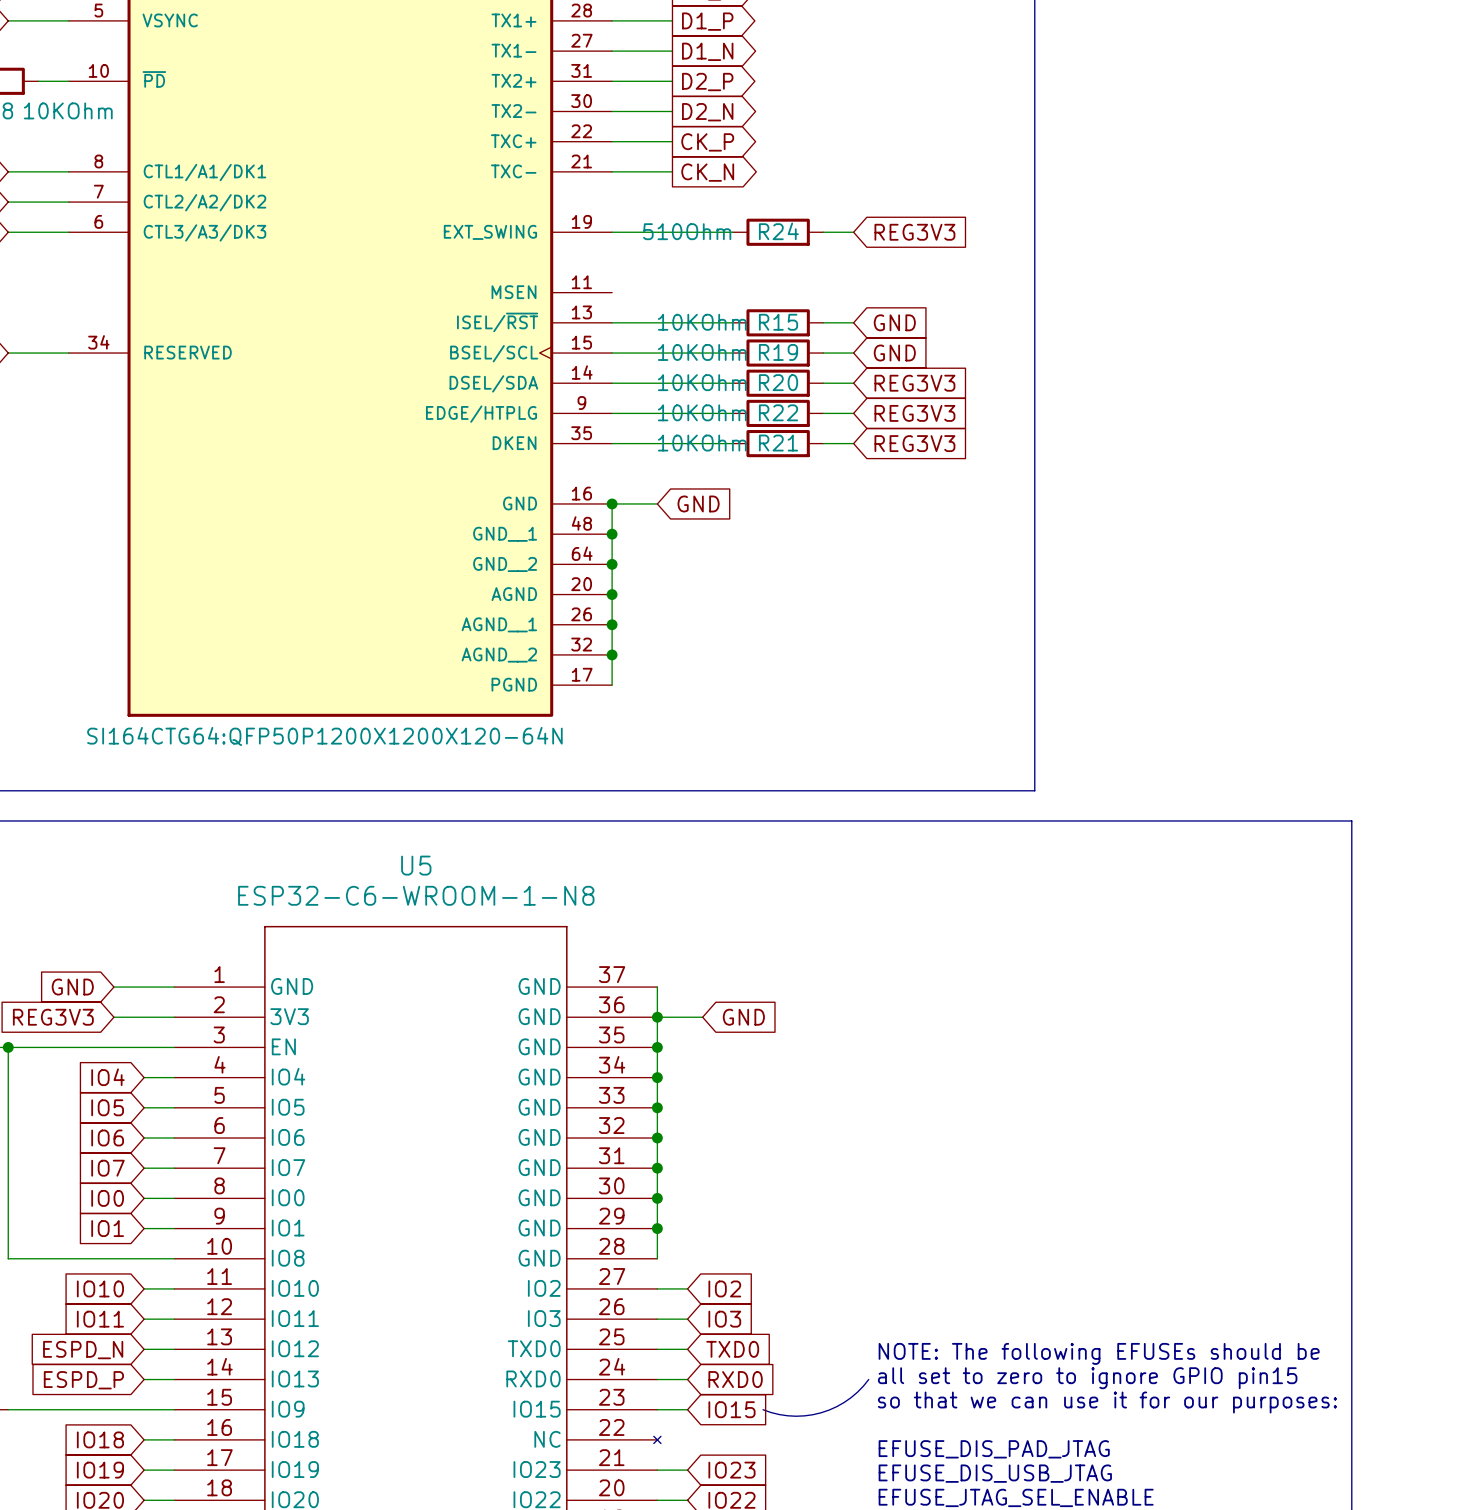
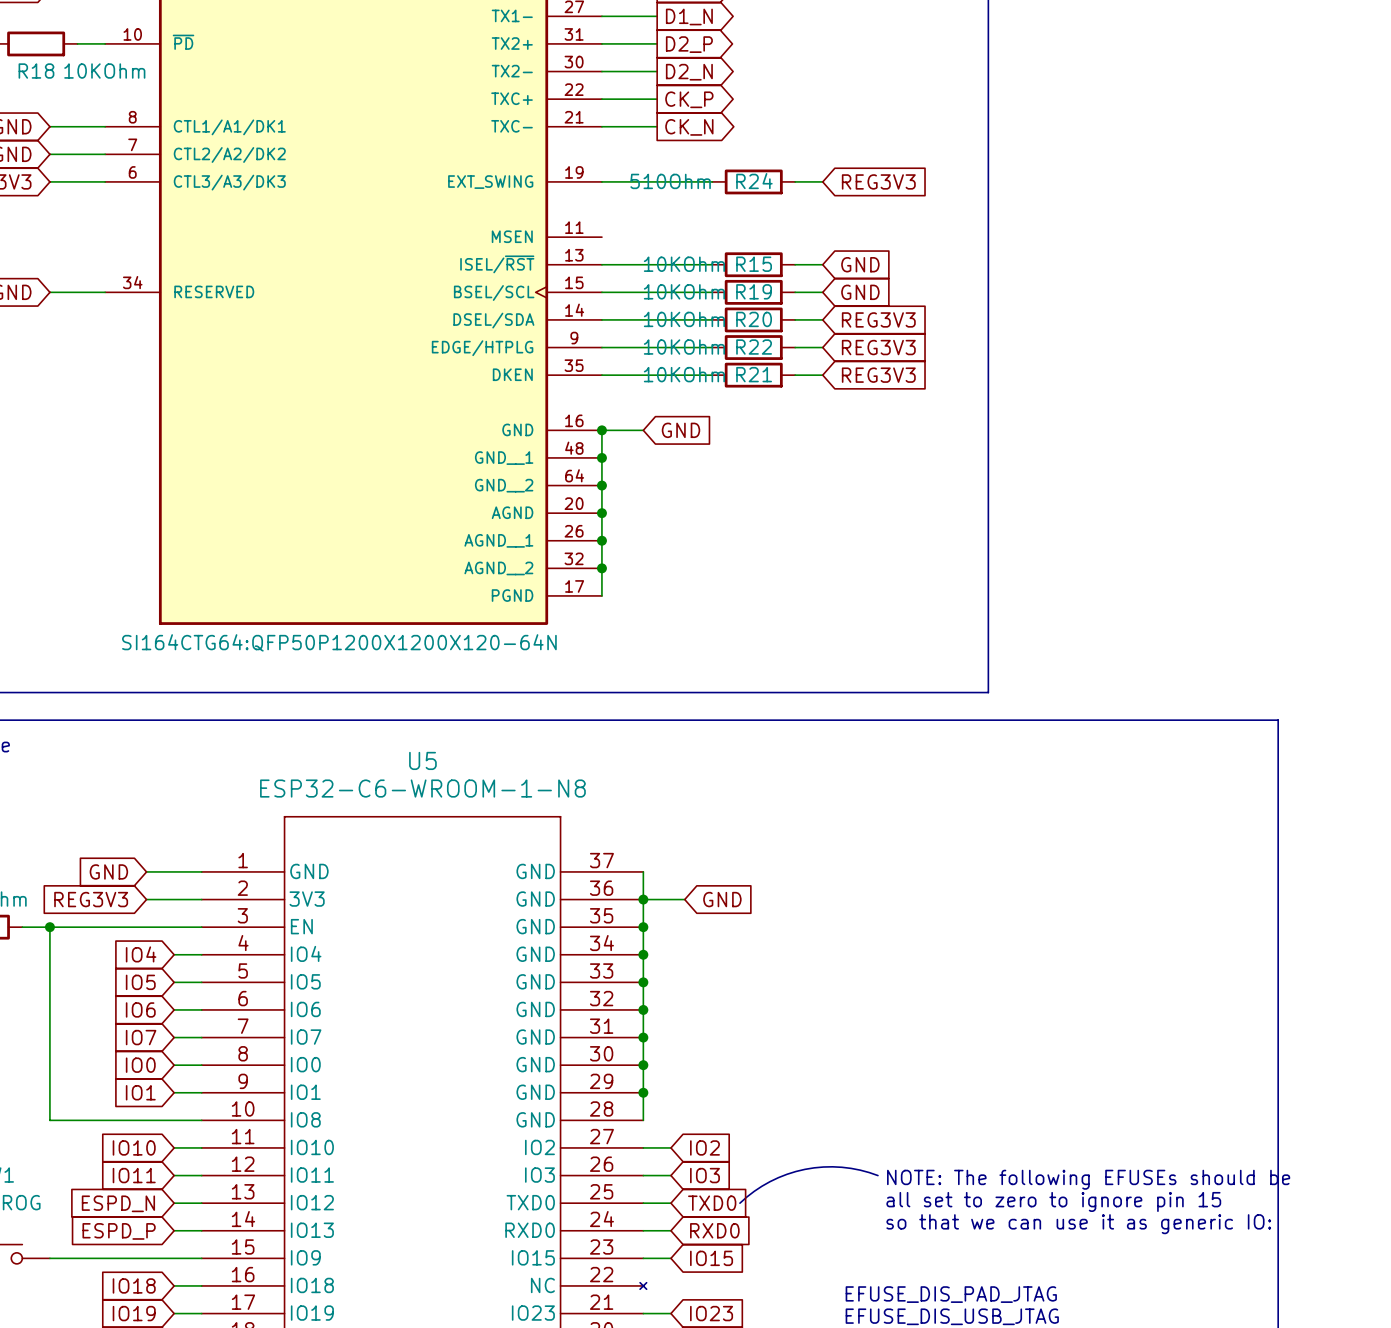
line: none -> (877, 1175) (841, 1167) (804, 1169) (770, 1181) (739, 1203)
text position: NOTE: The following EFUSEs should be (1099, 1353) -> NOTE: The following EFUSEs should be (1088, 1179)
text: all set to zero to ignore GPIO pin15 (1087, 1378) -> all set to zero to ignore pin 15 (1053, 1201)
line: (868, 1379) (851, 1397) (836, 1406) (821, 1412) (804, 1415) (787, 1415) (763, 1409) -> none
text: so that we can use it for our purposes: (1107, 1402) -> so that we can use it as generic IO: (1078, 1224)

